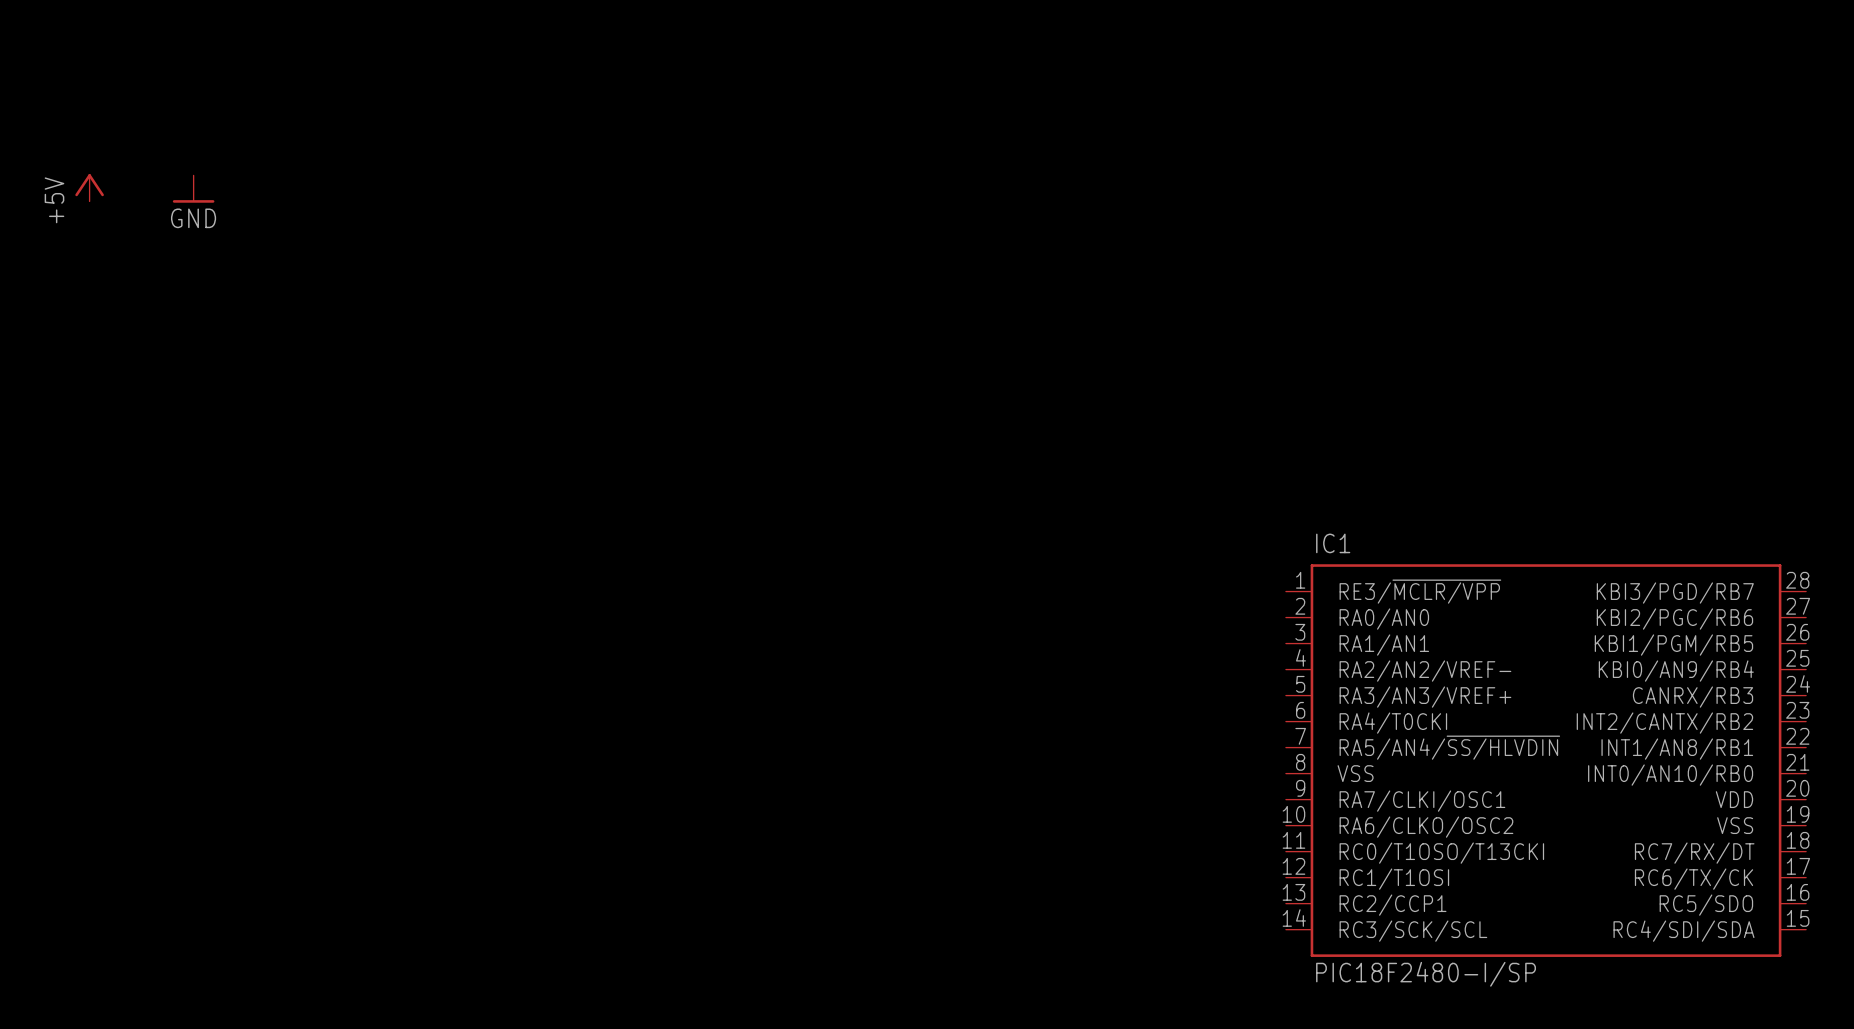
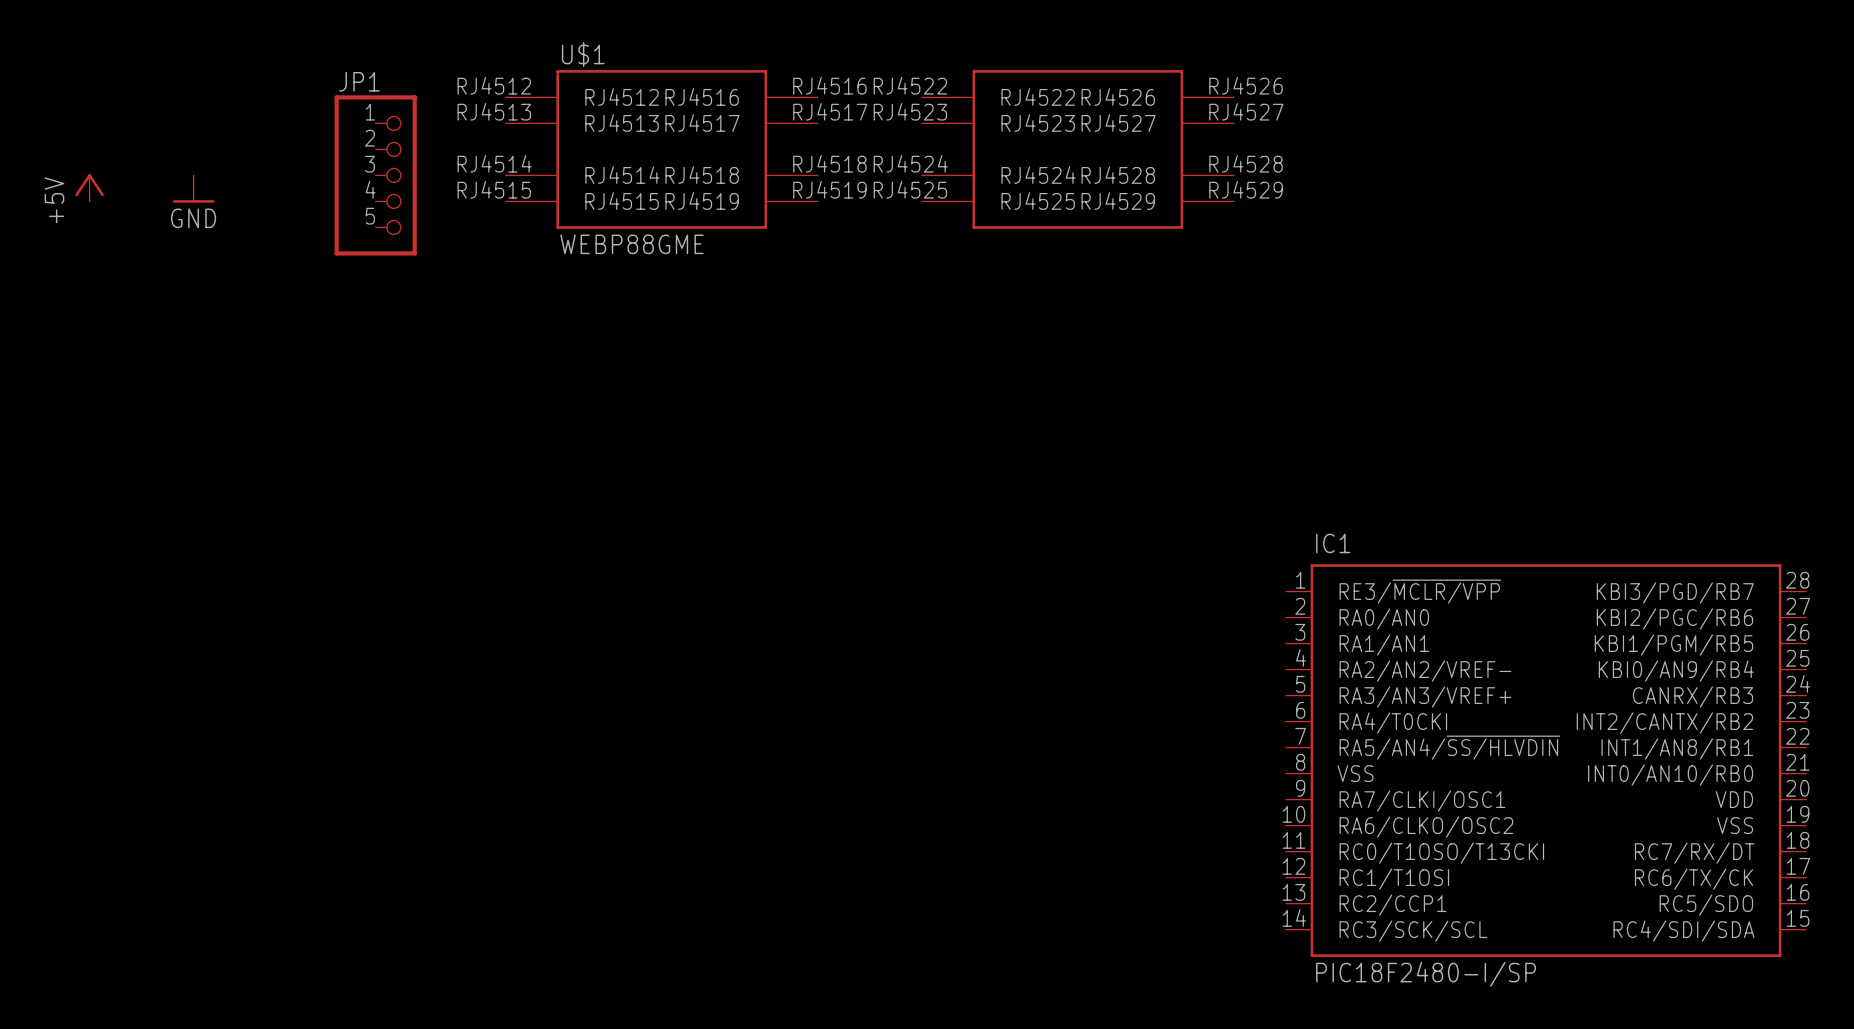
U$1: none -> WEBP88GME (869, 149)
JP1: none -> (375, 175)

